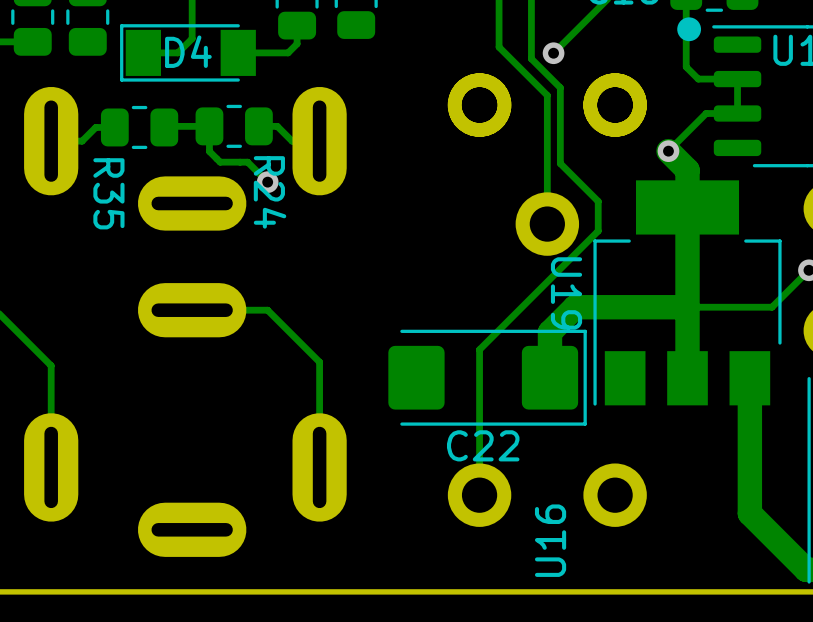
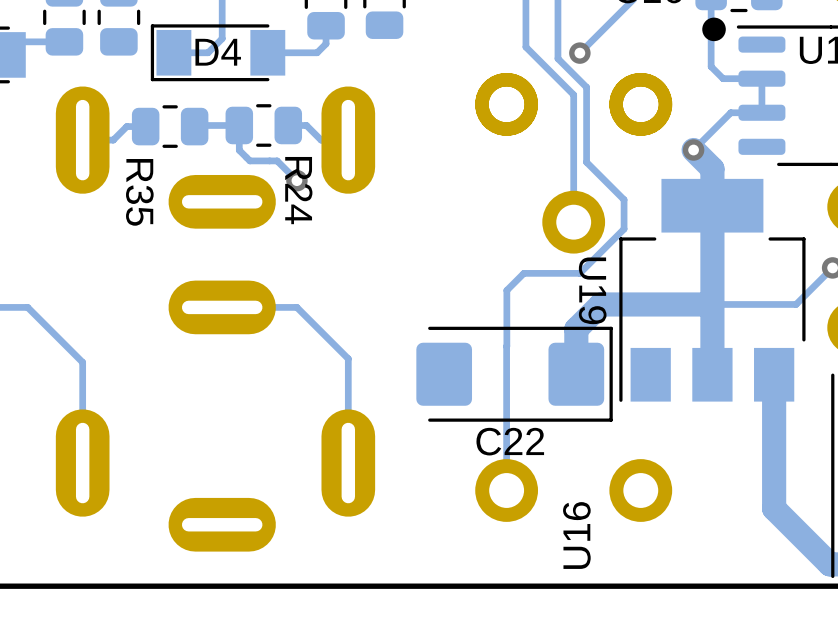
track: (553, 275) (479, 349) -> (579, 273) (523, 273) (506, 290) (506, 346)

